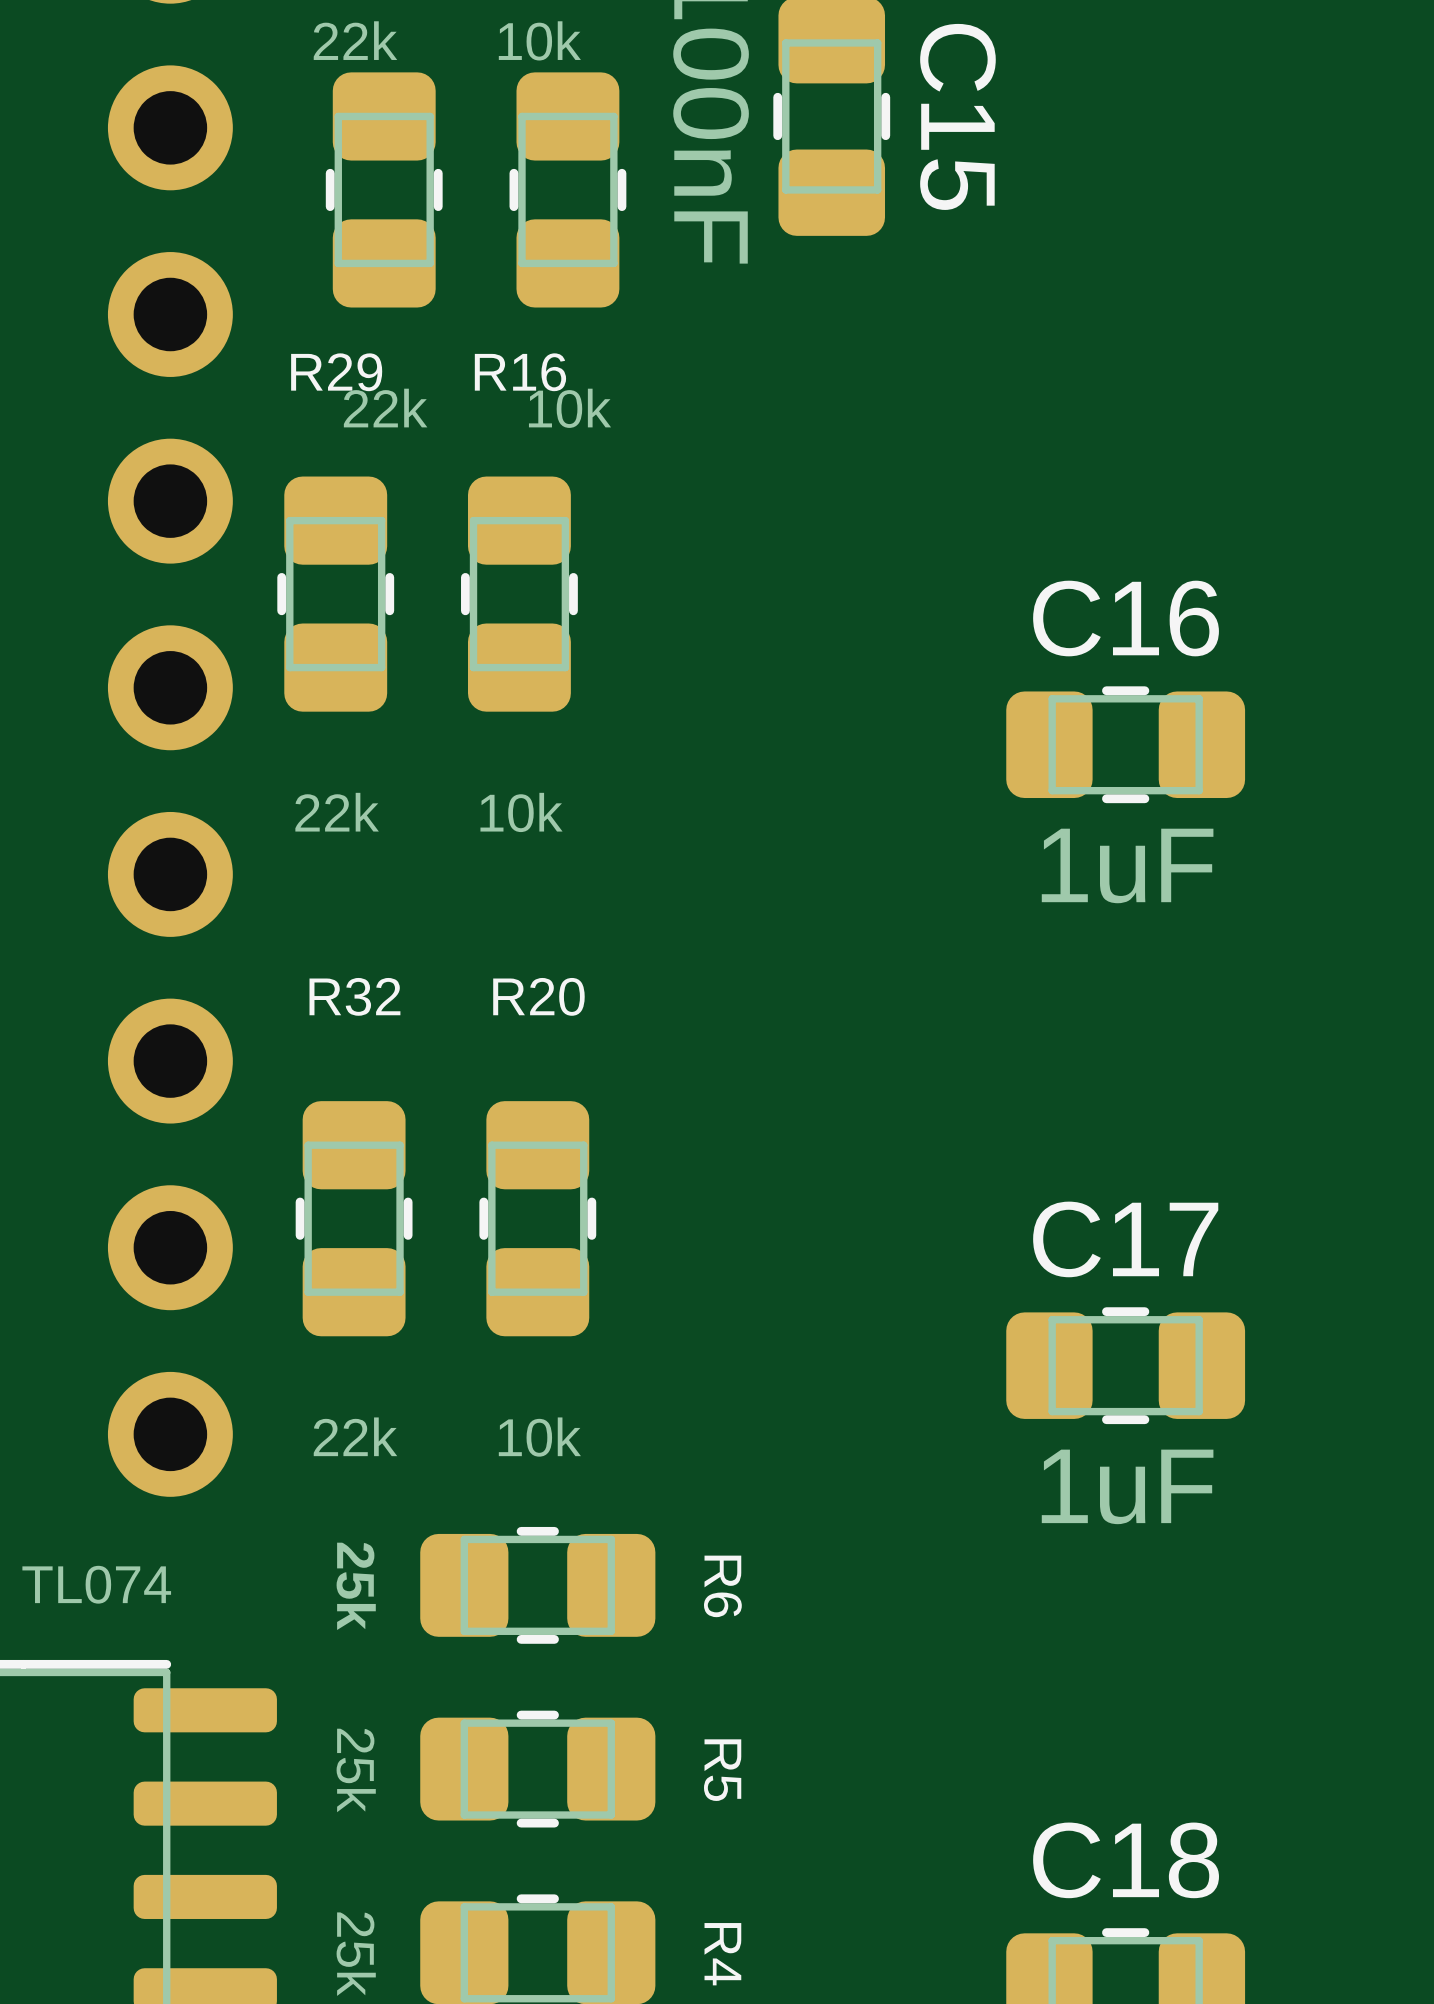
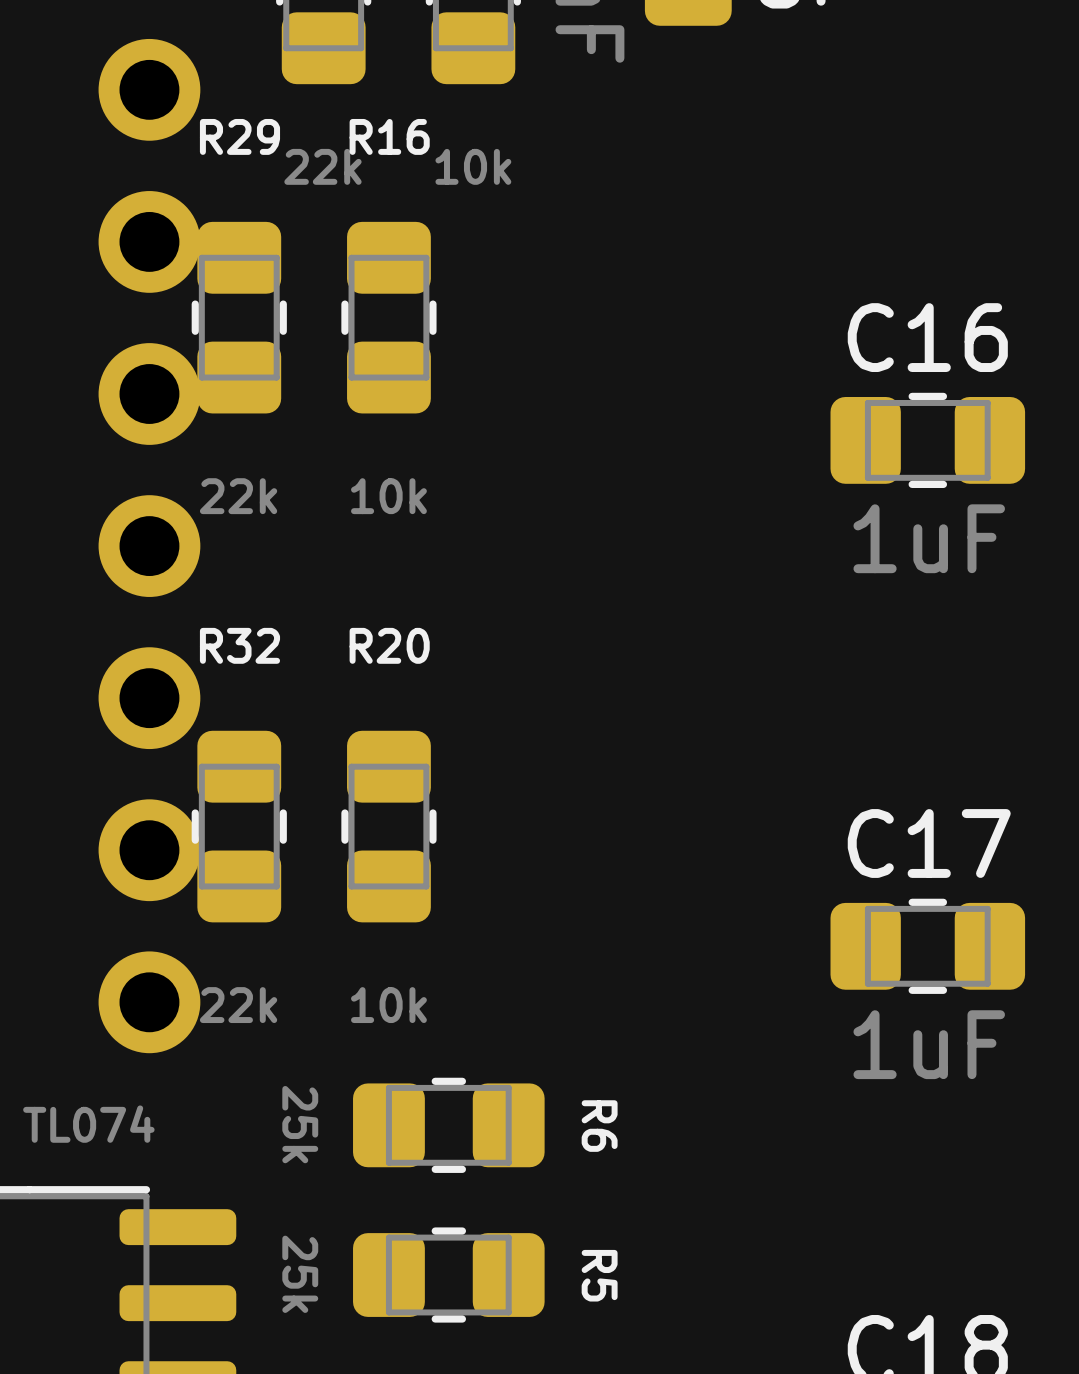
R29 position: (335, 594) -> (239, 317)
R16 position: (519, 594) -> (388, 317)
R32 position: (354, 1218) -> (239, 826)
R20 position: (537, 1218) -> (388, 826)

